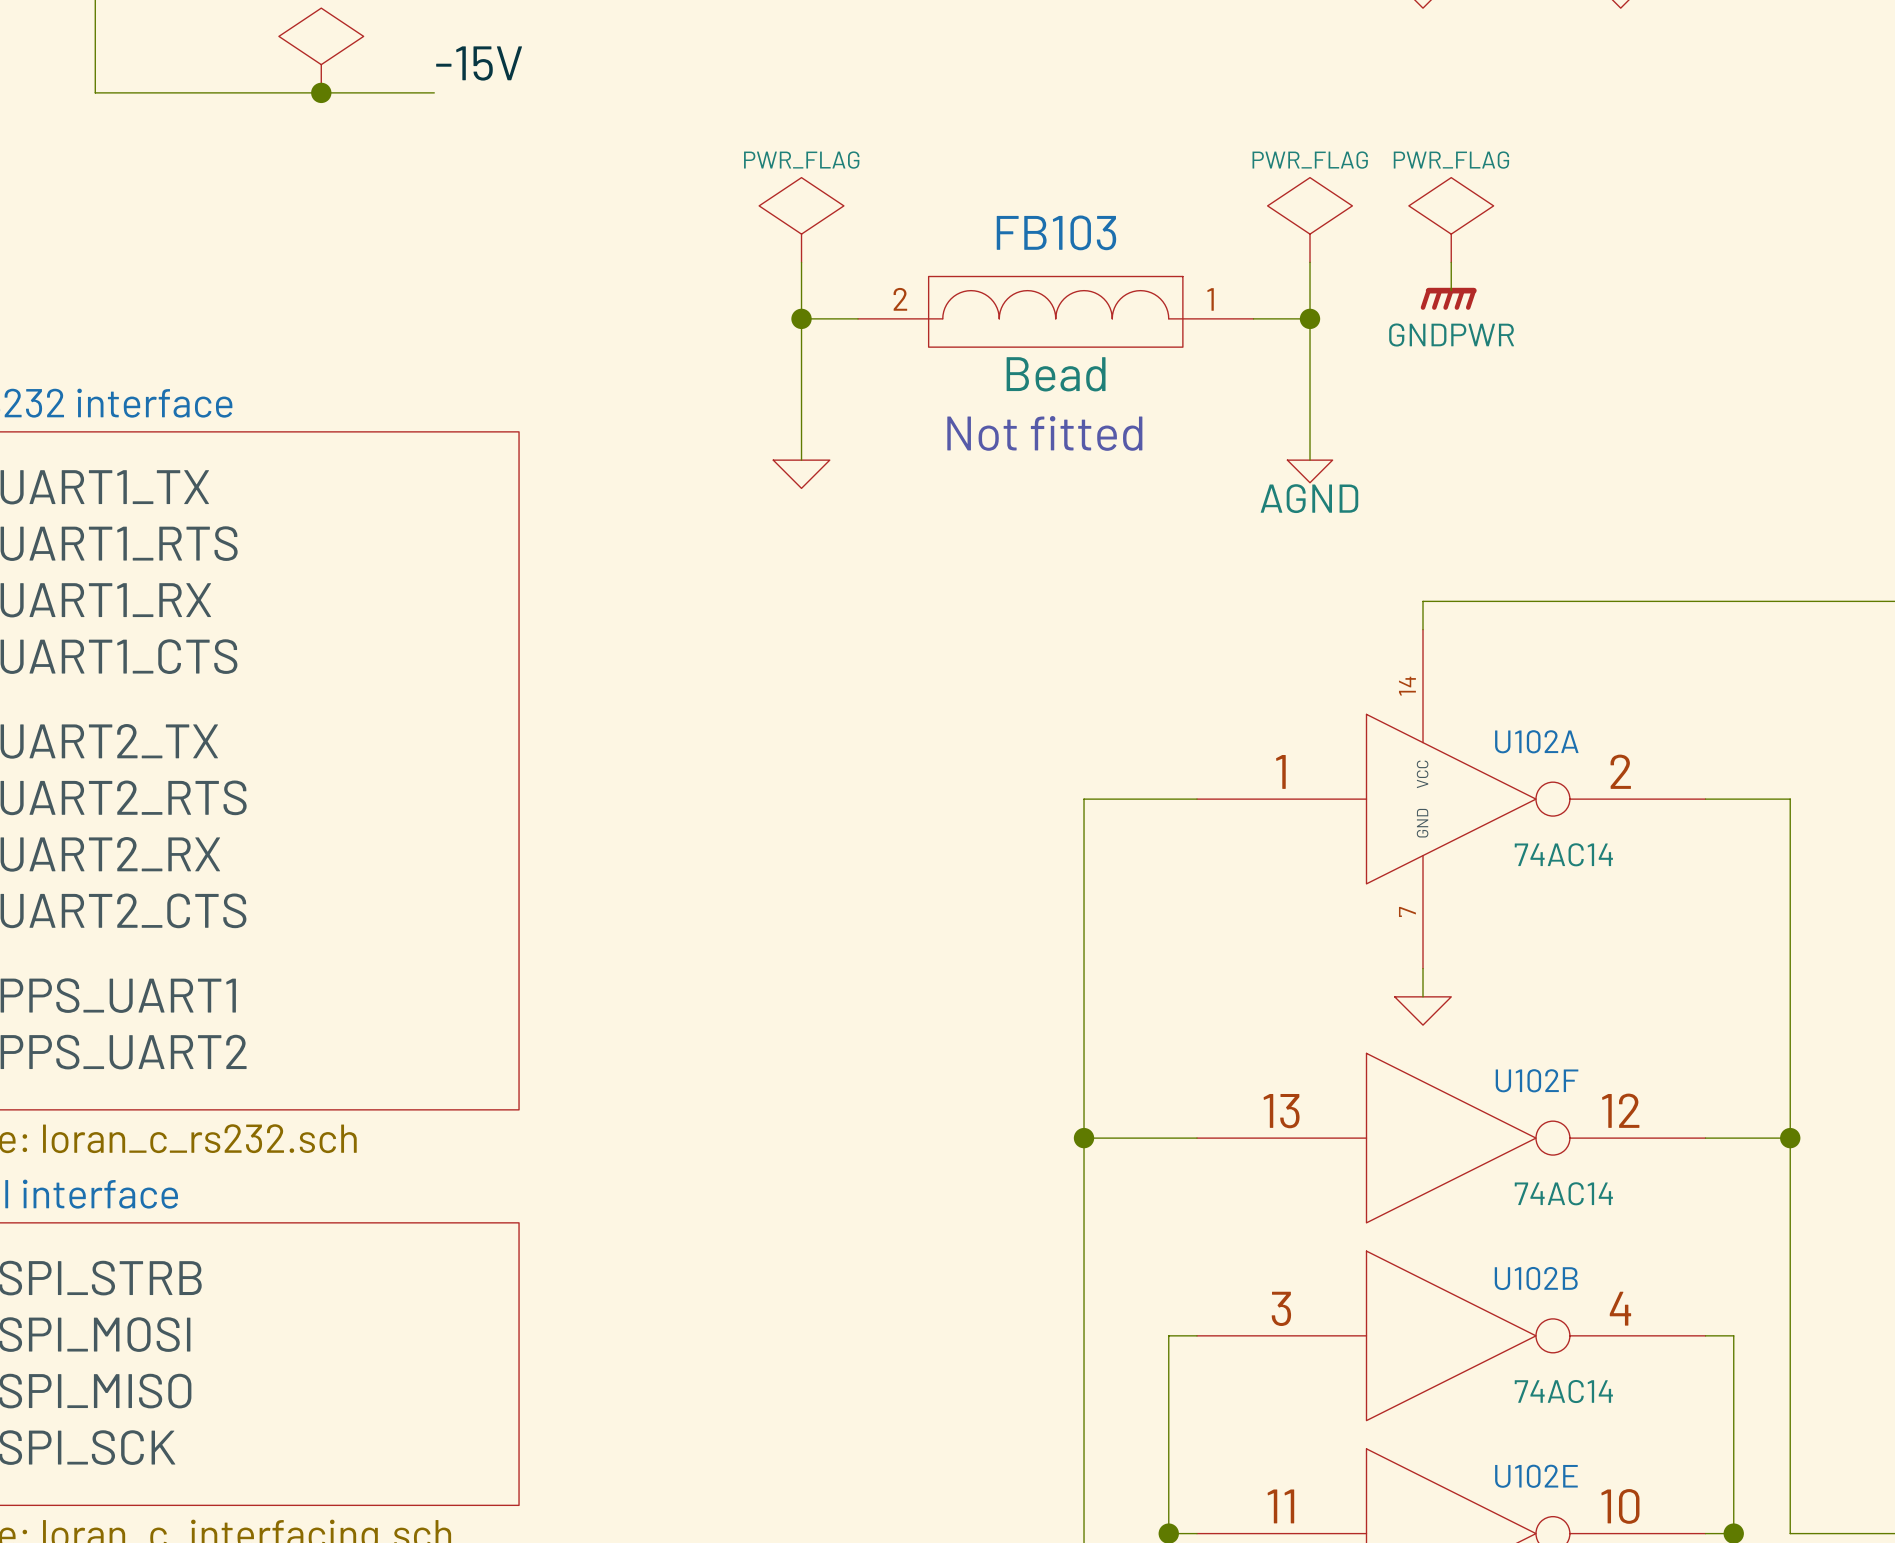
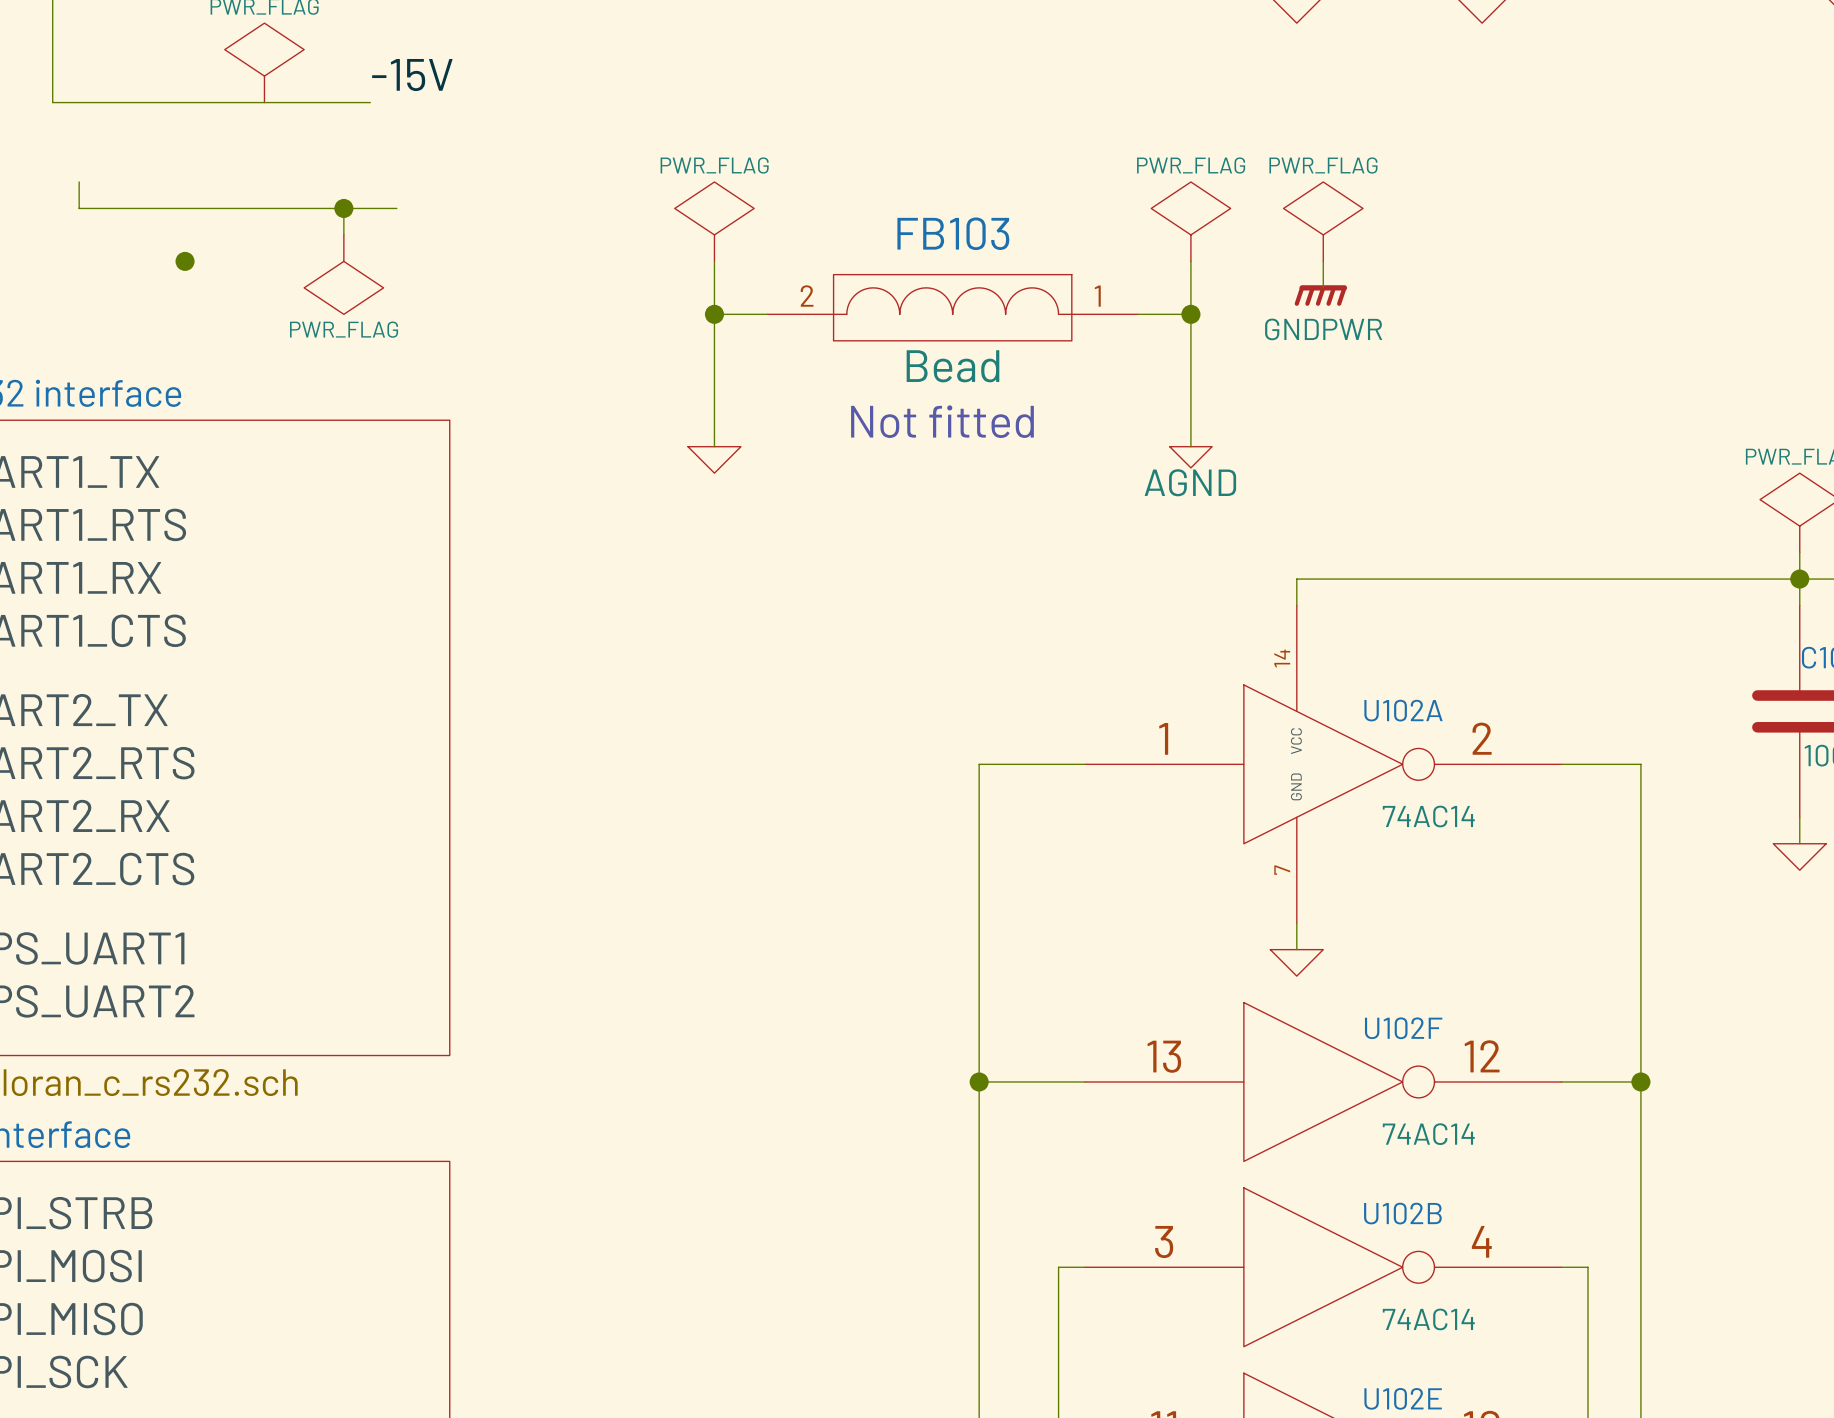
junction: (321, 92) -> none
wire: none -> (79, 181) (79, 208) (396, 208)
wire: none -> (343, 208) (343, 234)
junction: none -> (343, 208)
junction: none -> (185, 261)
power symbol: none -> PWR_FLAG (343, 274)

